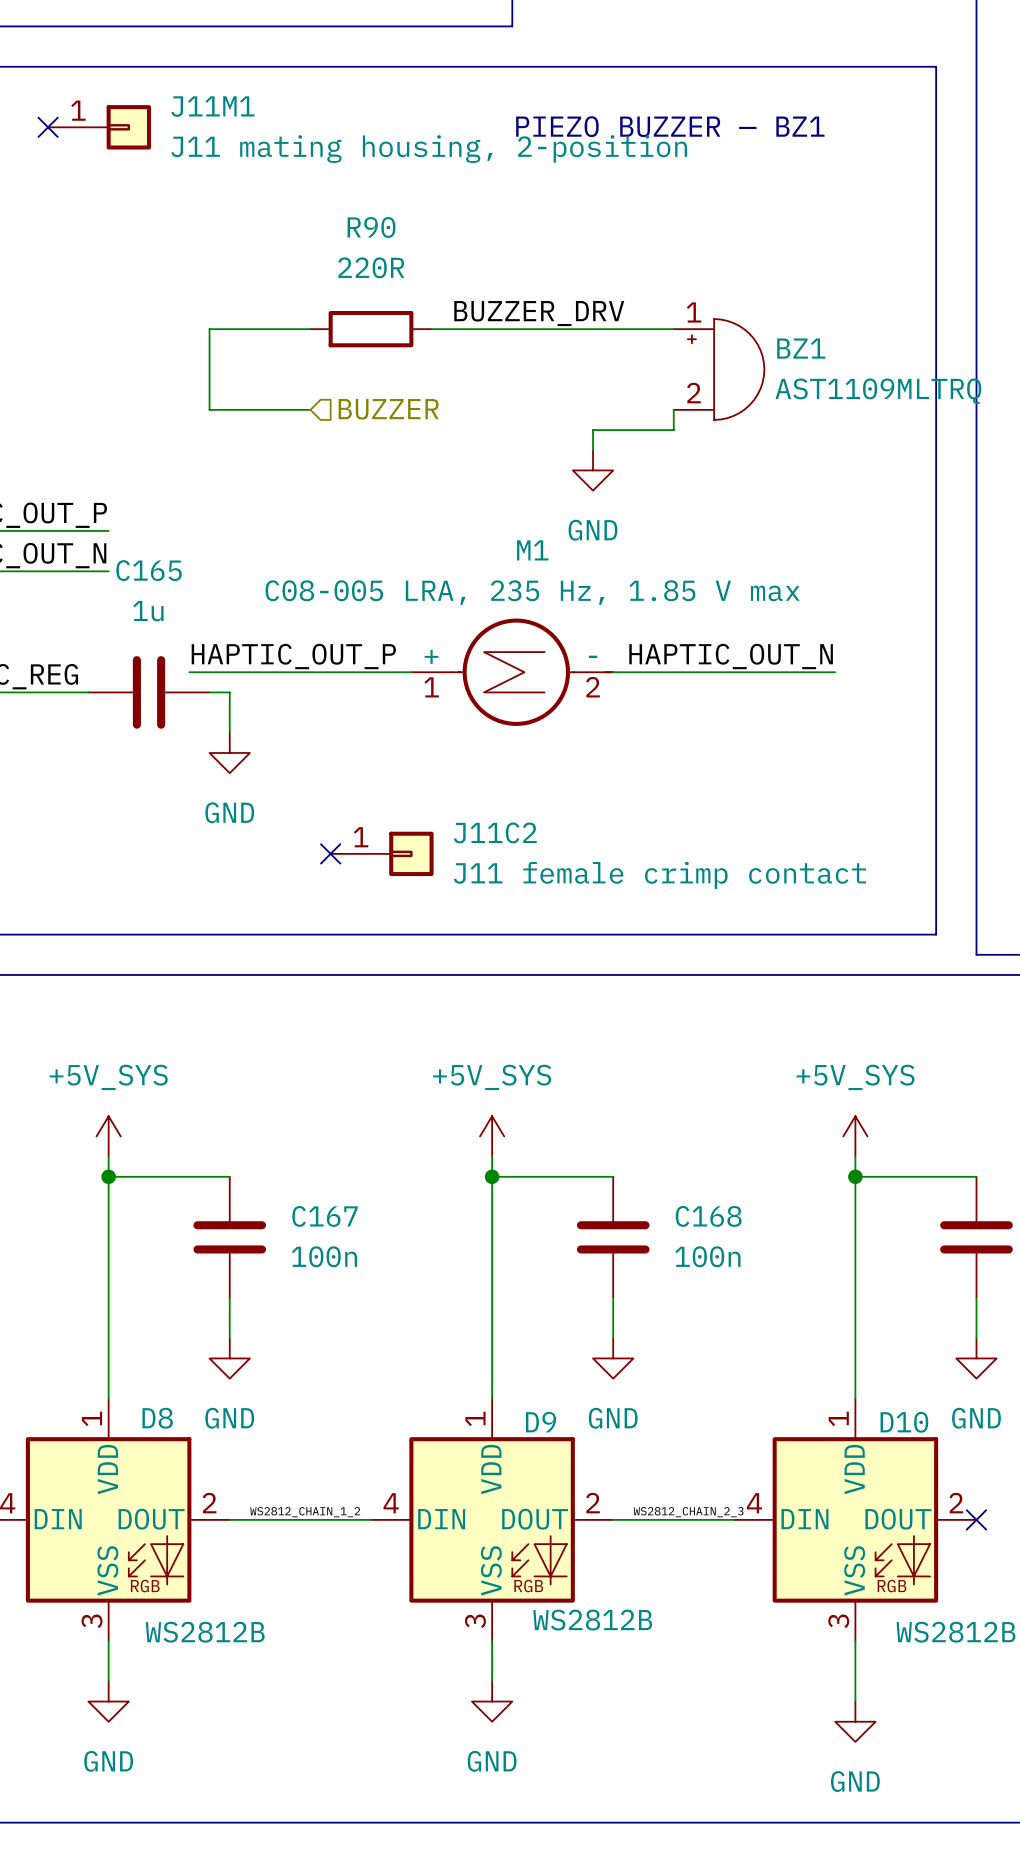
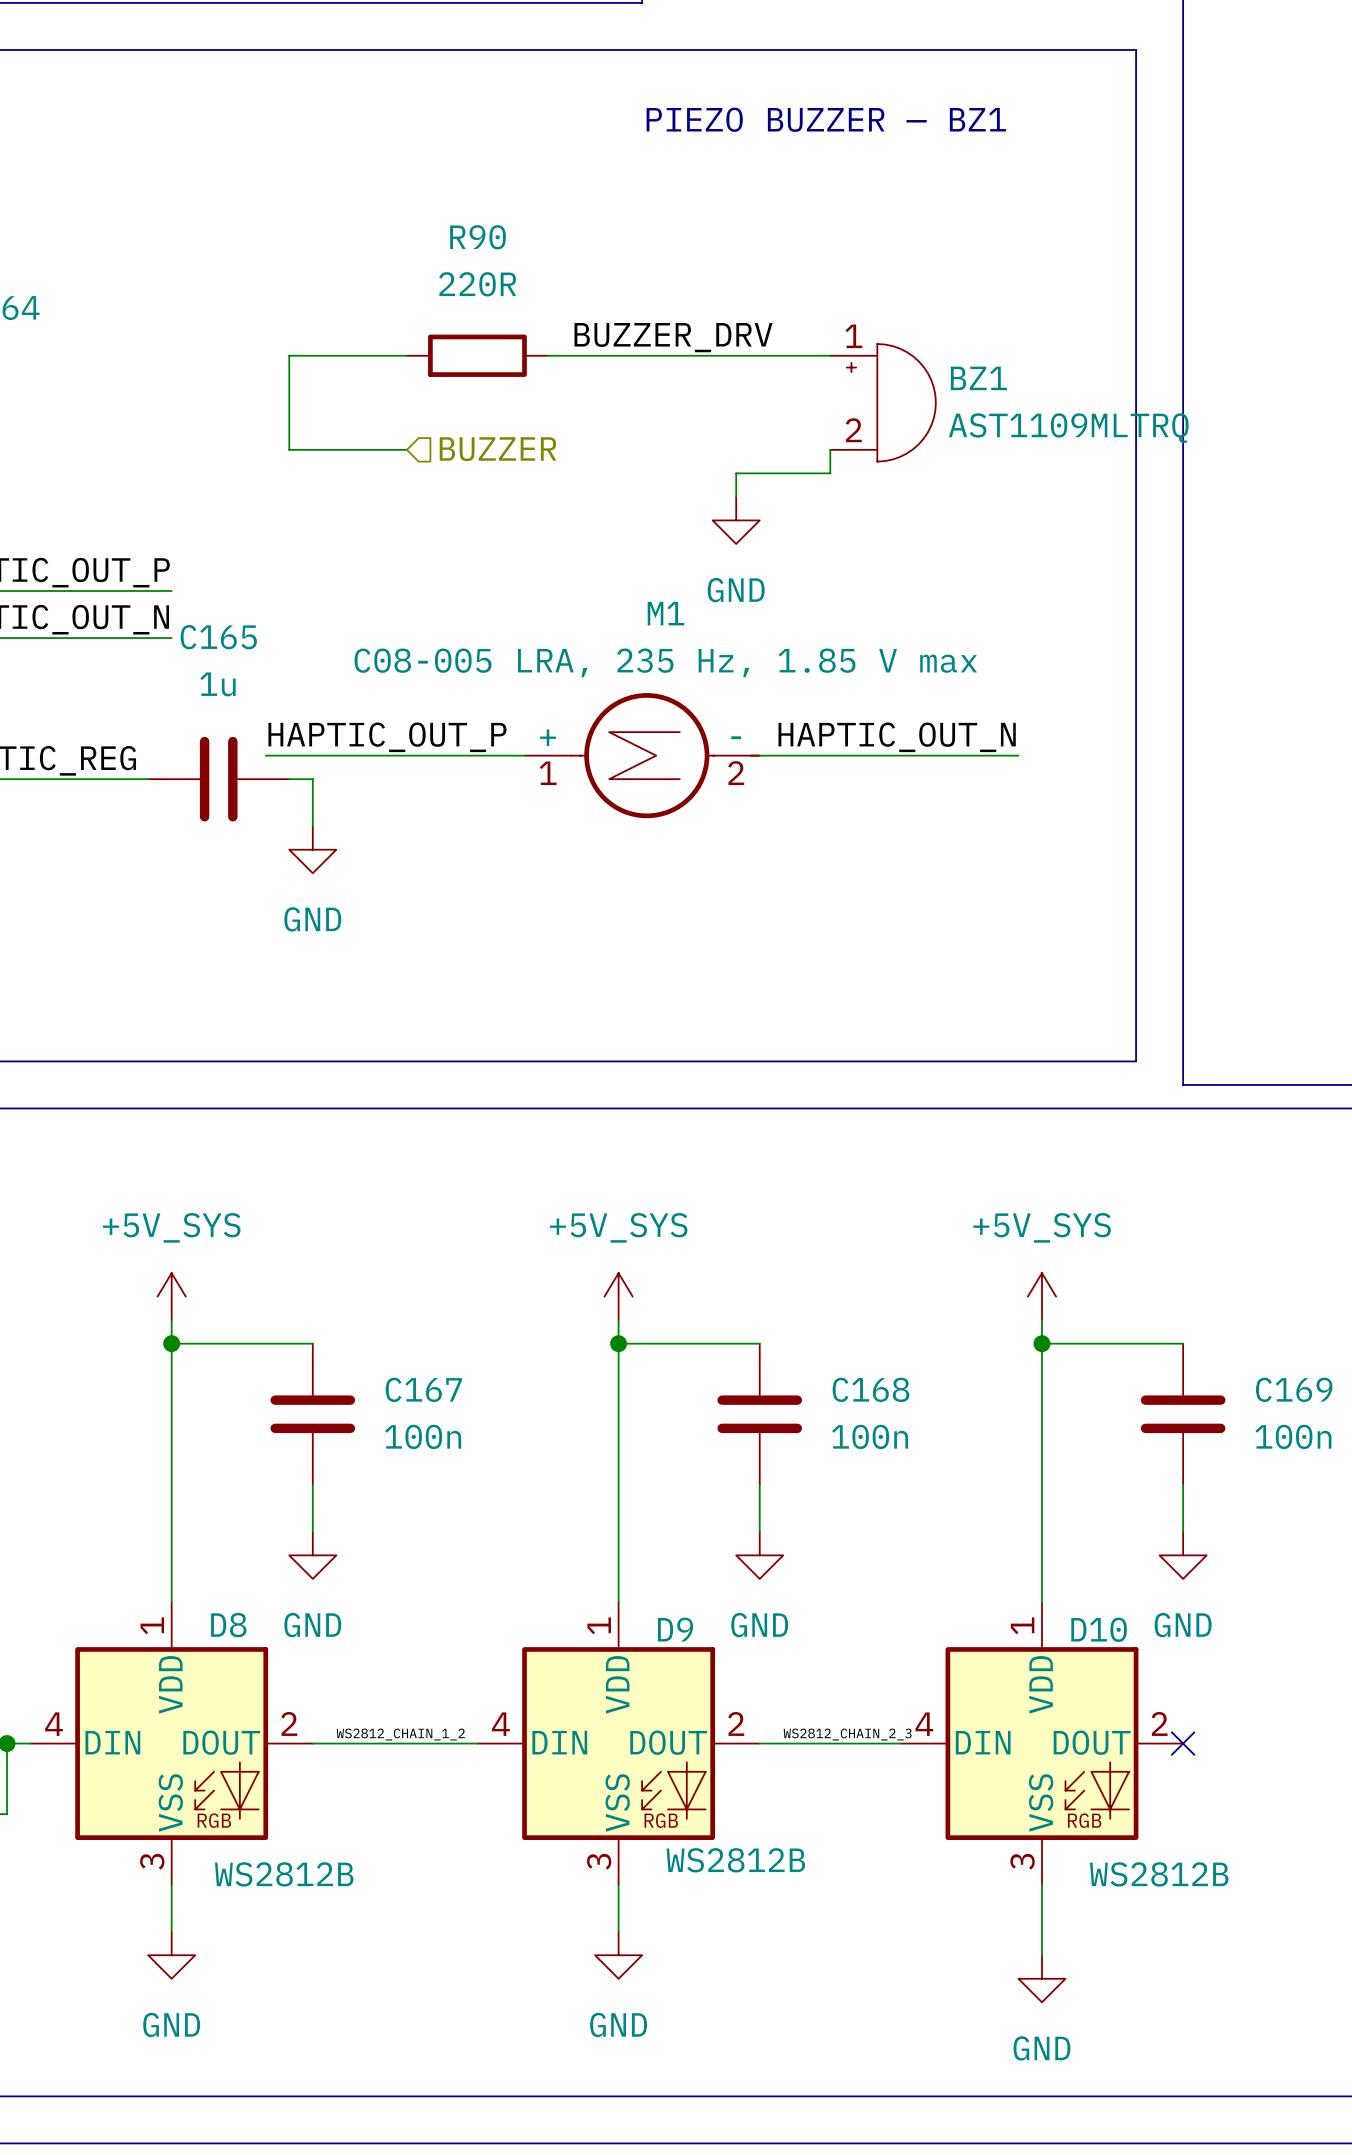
no-connect mark: (48, 127) -> none
J11M1: J11 mating housing, 2-position (99, 127) -> none
no-connect mark: (330, 853) -> none
J11C2: J11 female crimp contact (382, 853) -> none

